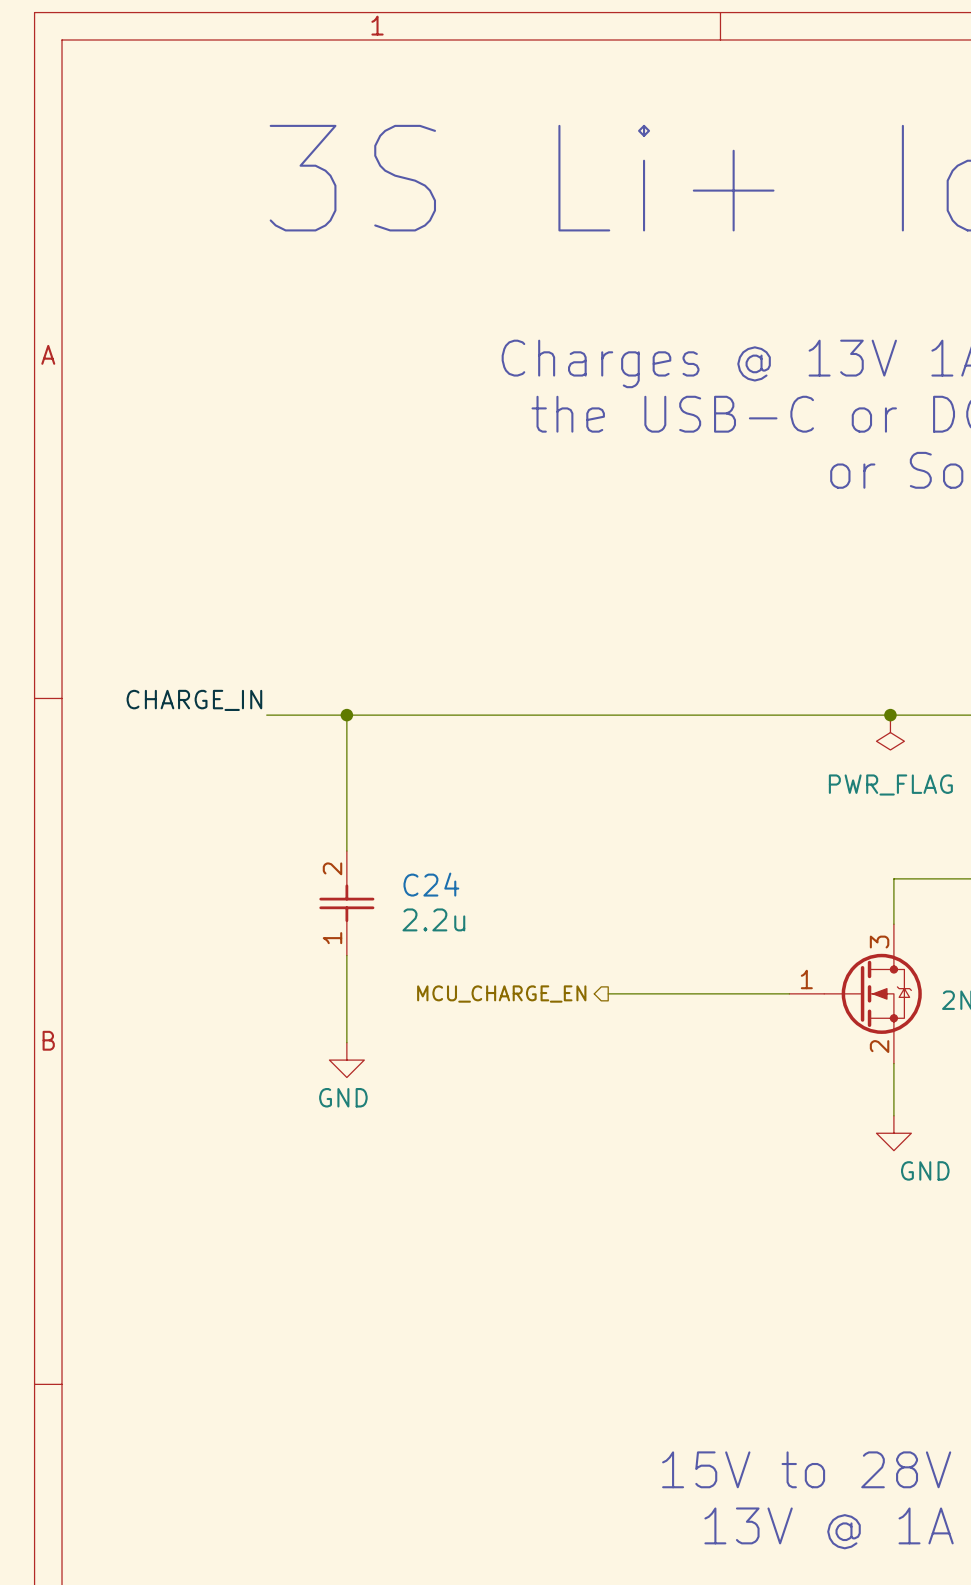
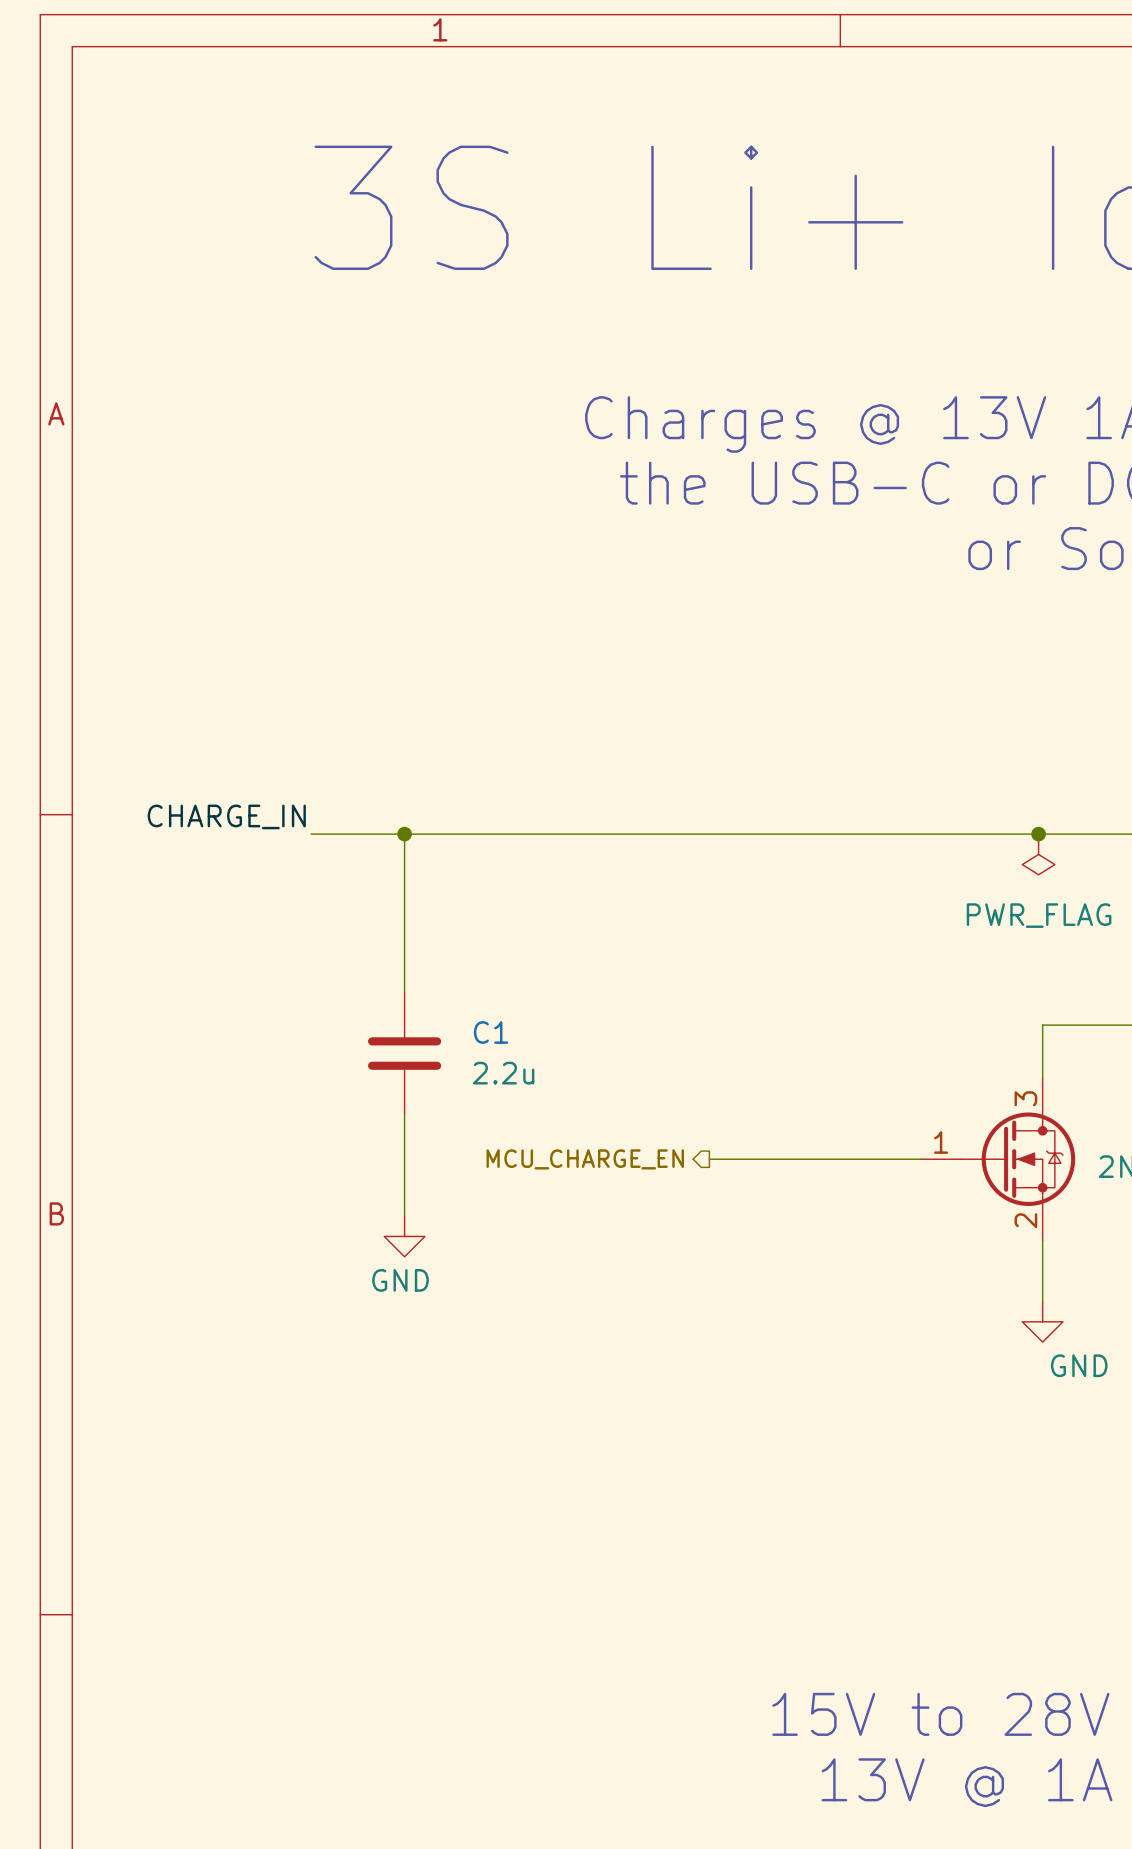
C24: 2.2u (346, 903) -> none
C1: none -> 2.2u (404, 1053)

